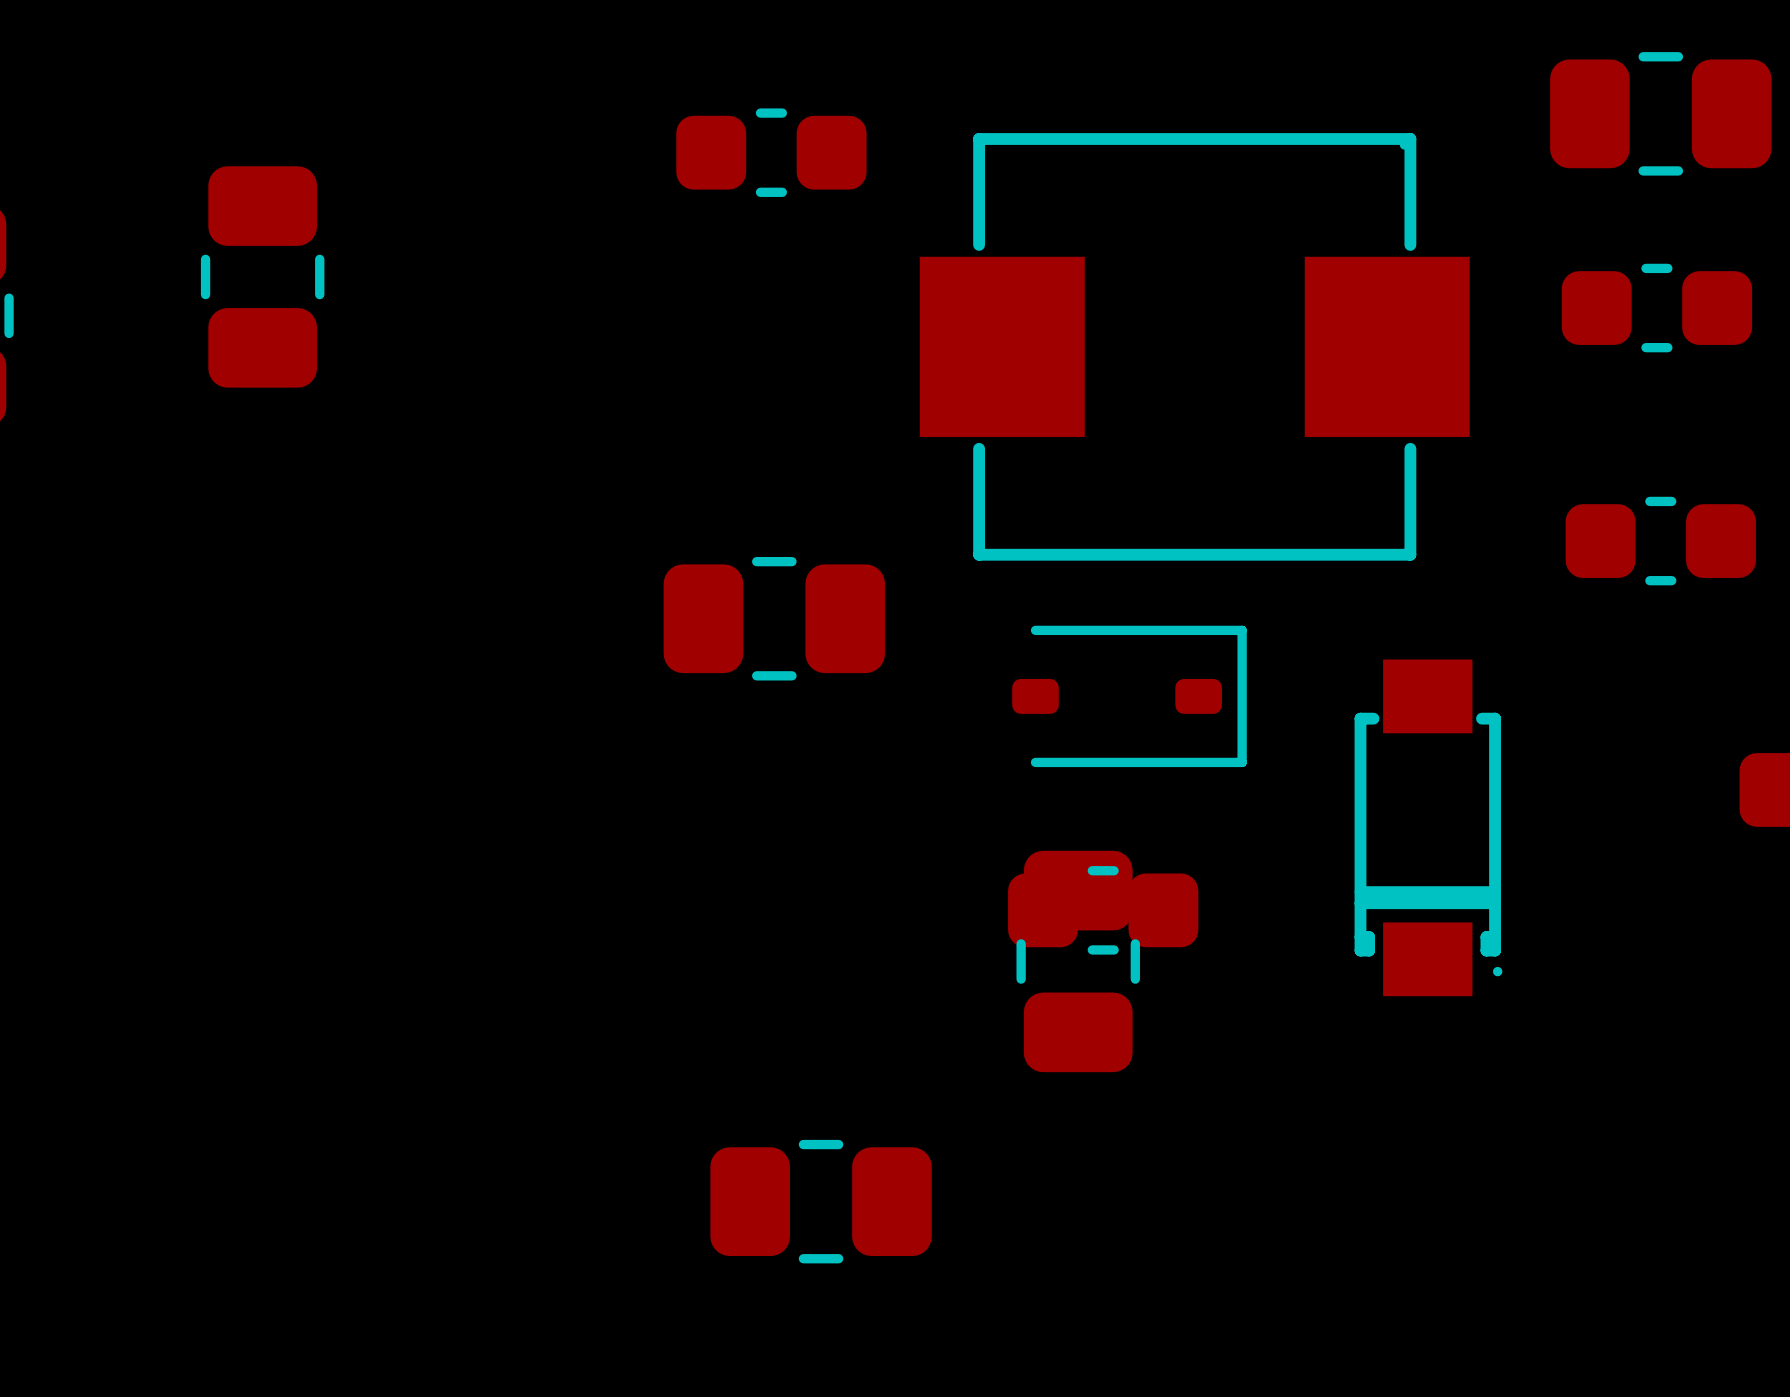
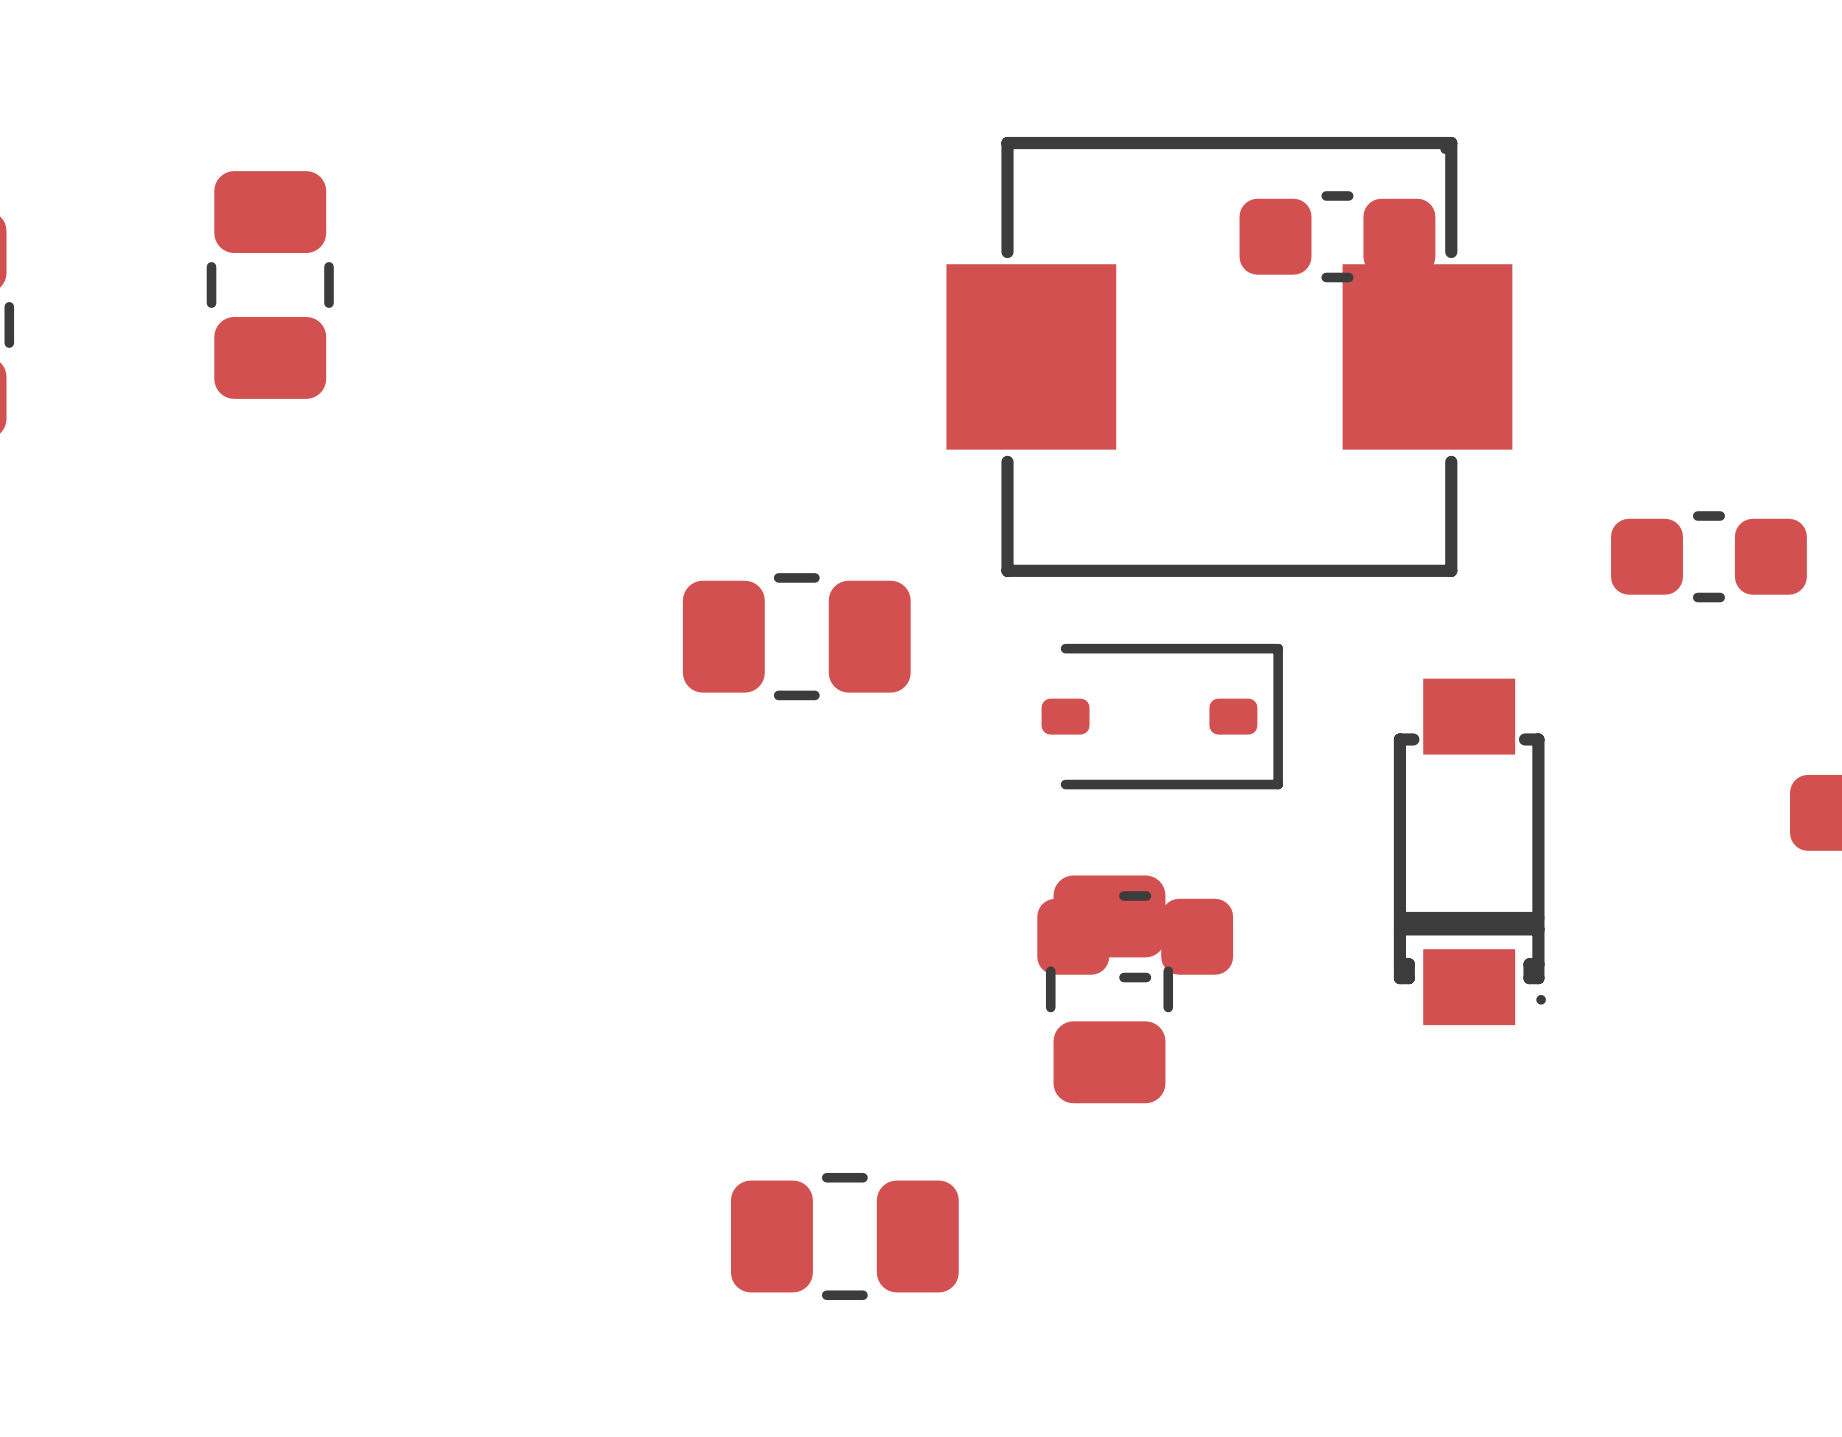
part: (1660, 113) -> none
part: (771, 152) -> none
part: none -> (1337, 236)
part: (1656, 308) -> none

